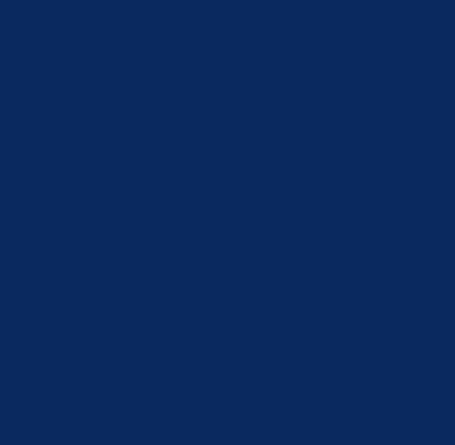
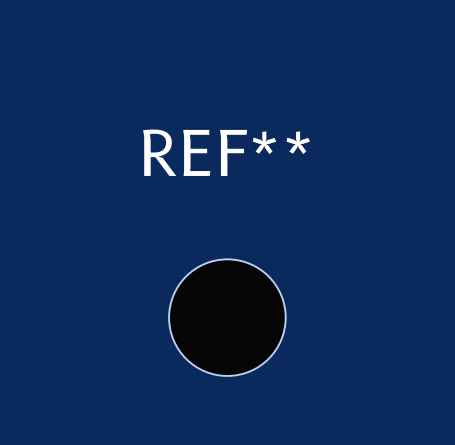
REF**: none -> (227, 317)

